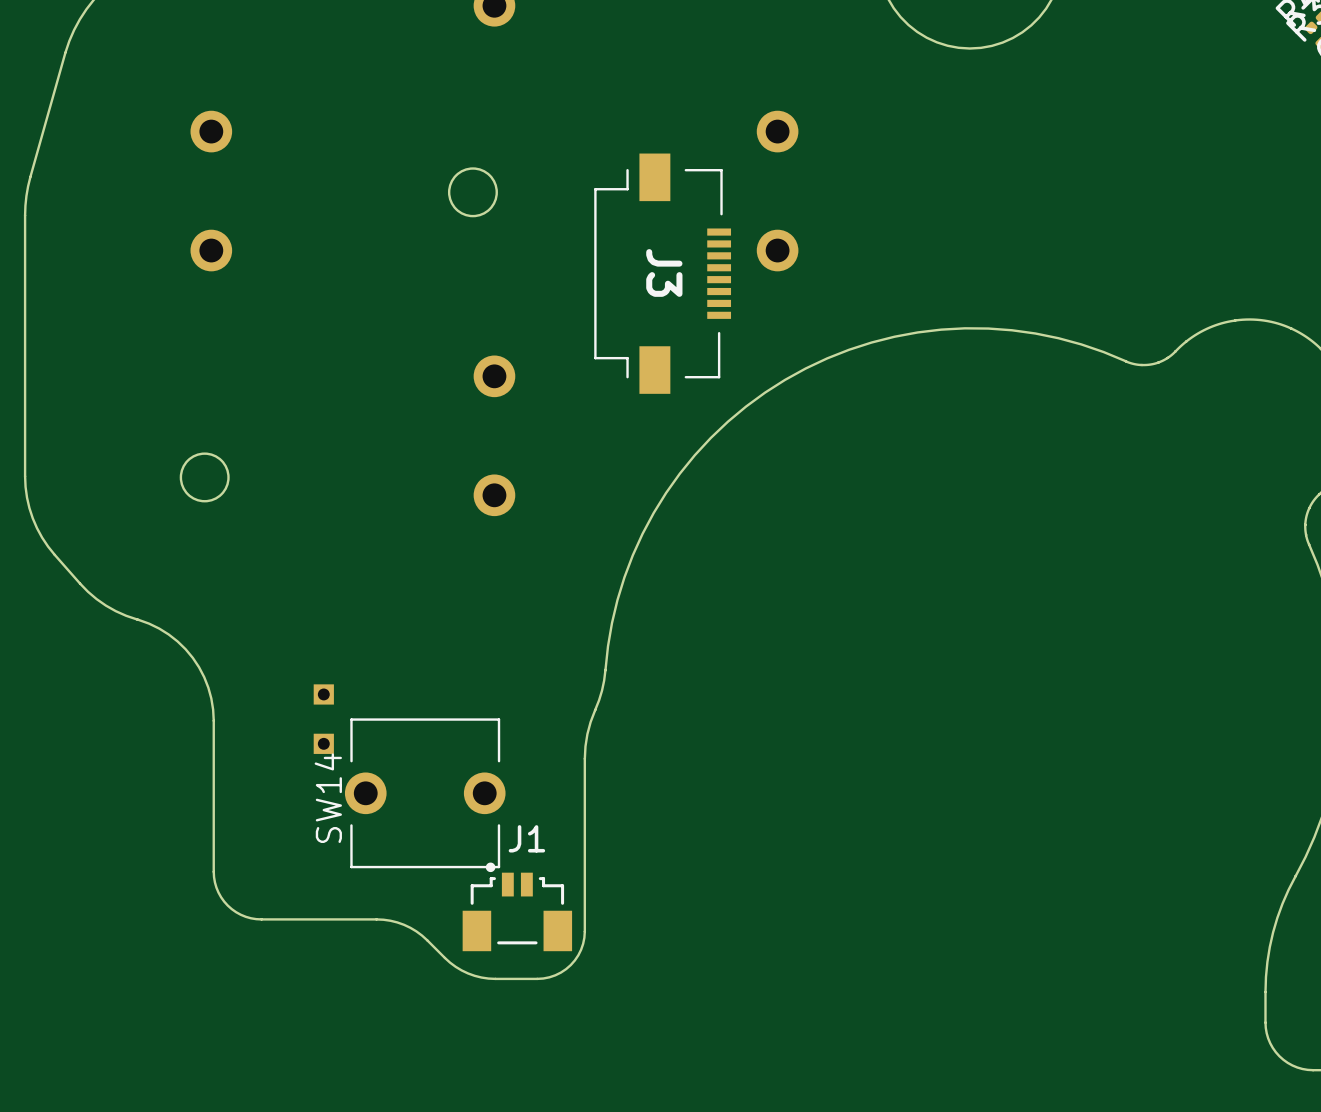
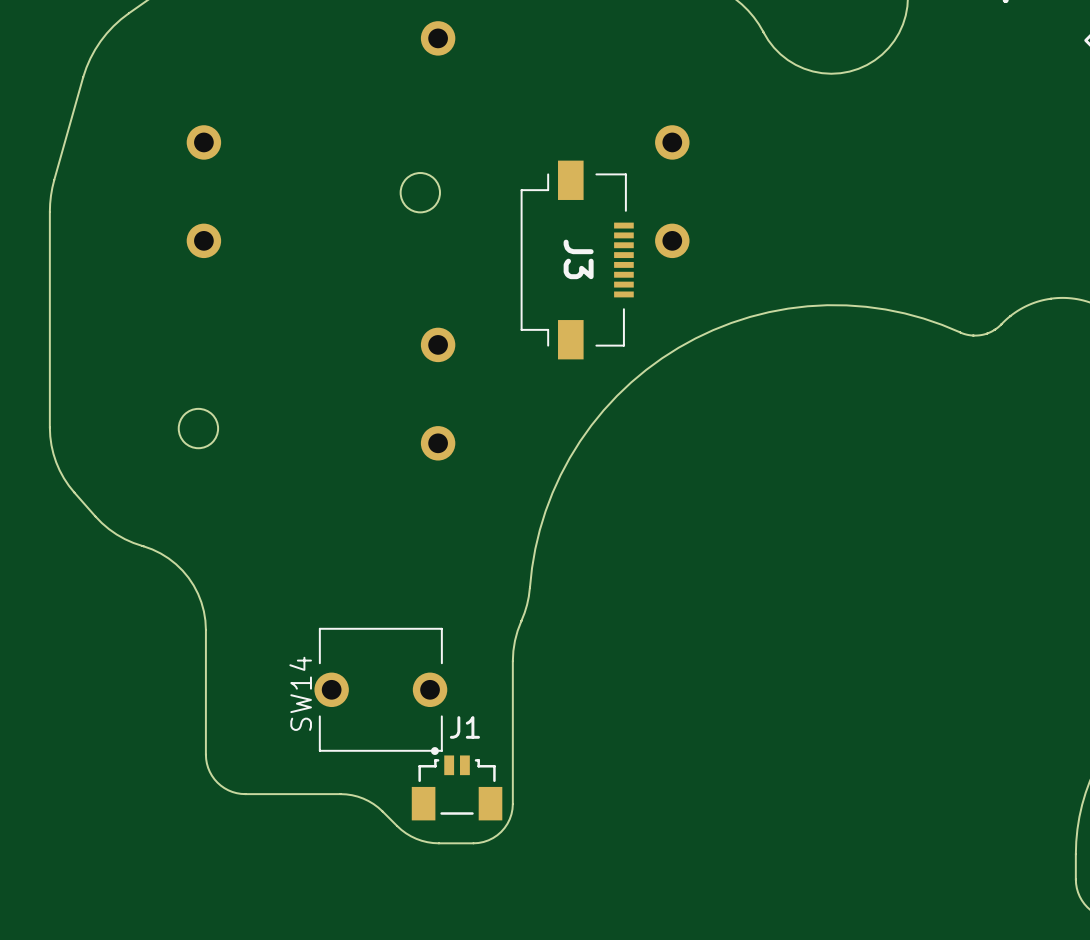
part: (323, 694) -> none
part: (323, 743) -> none

